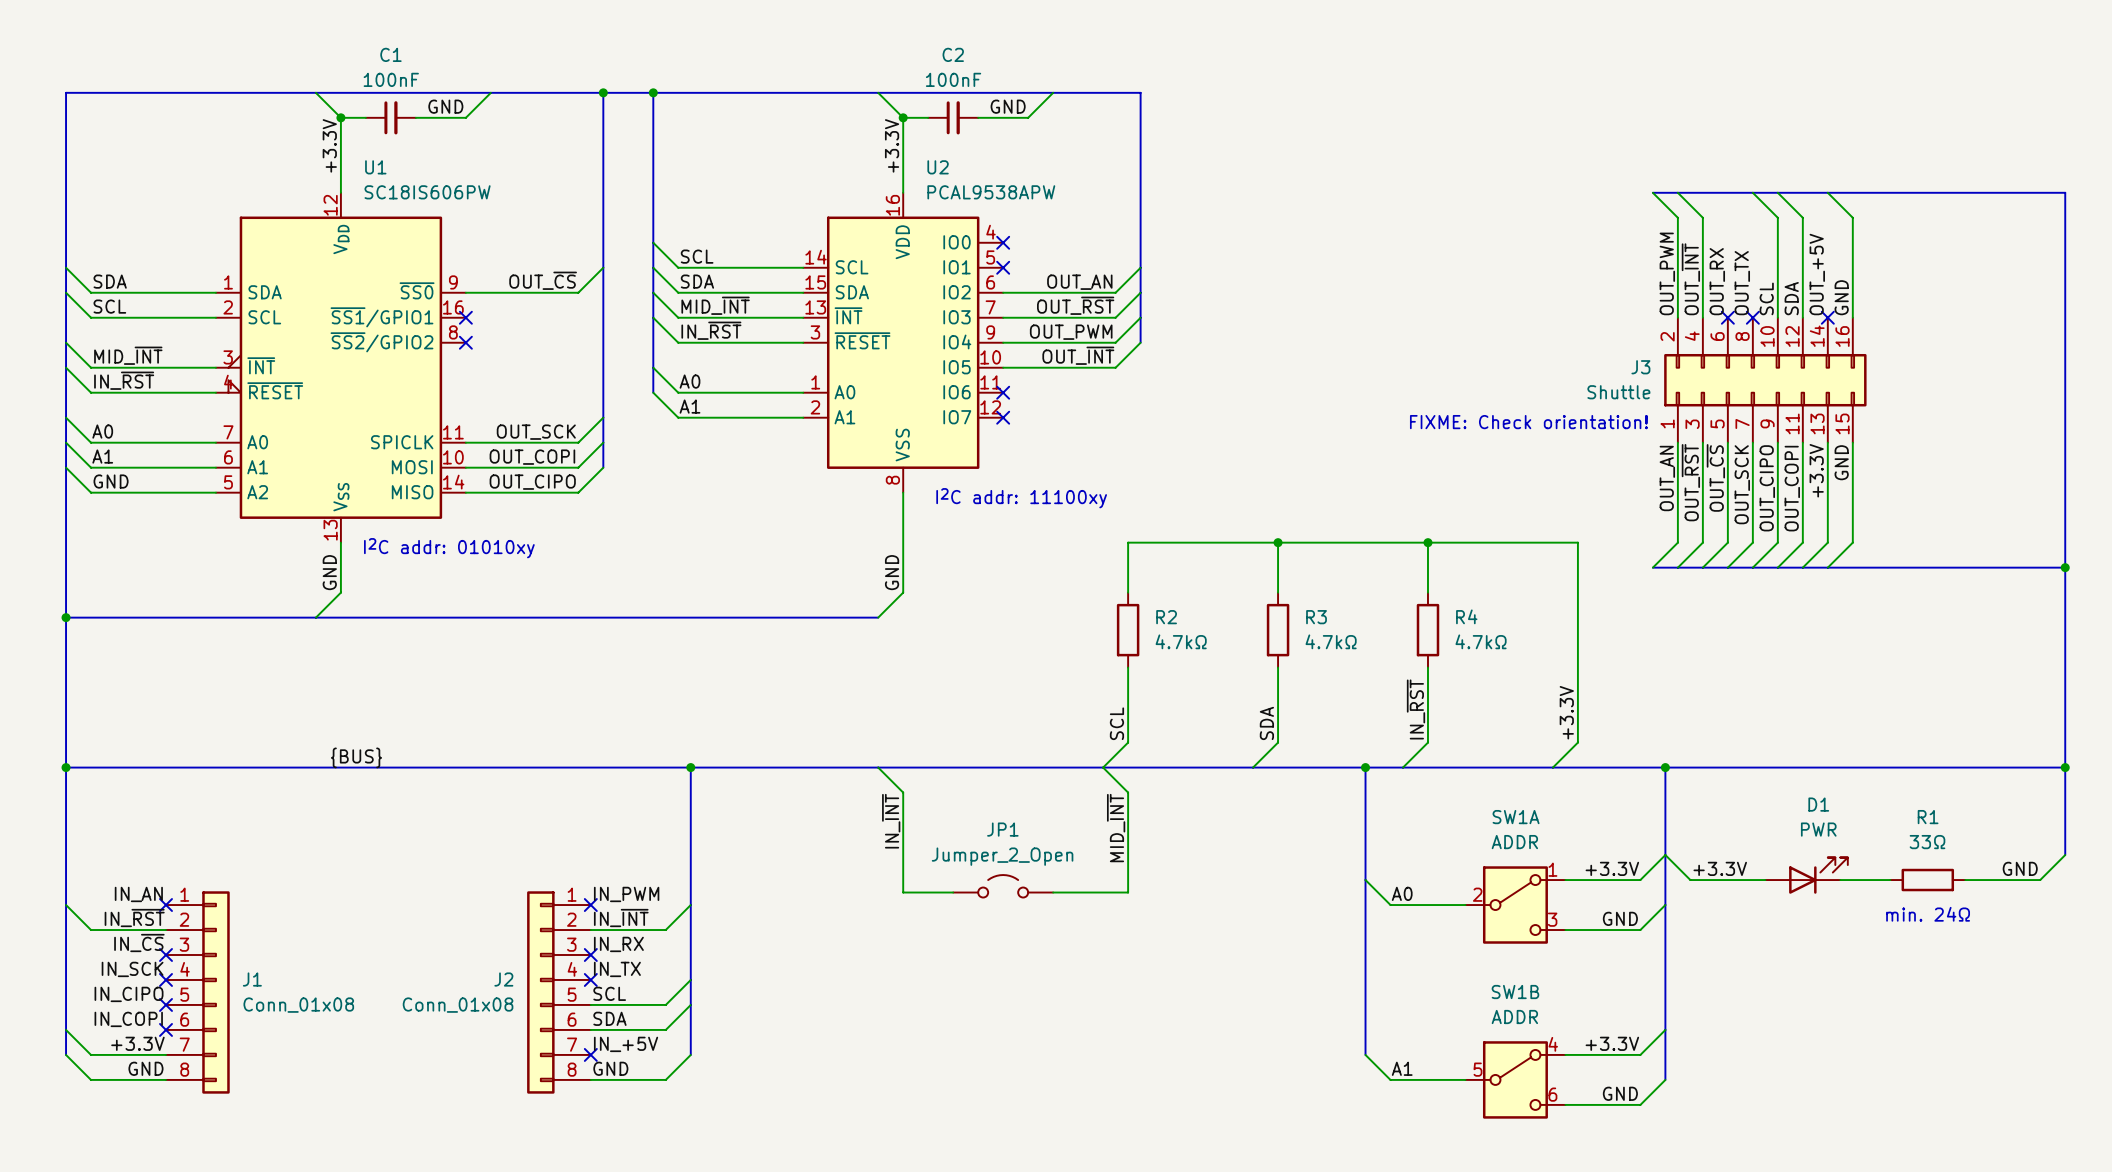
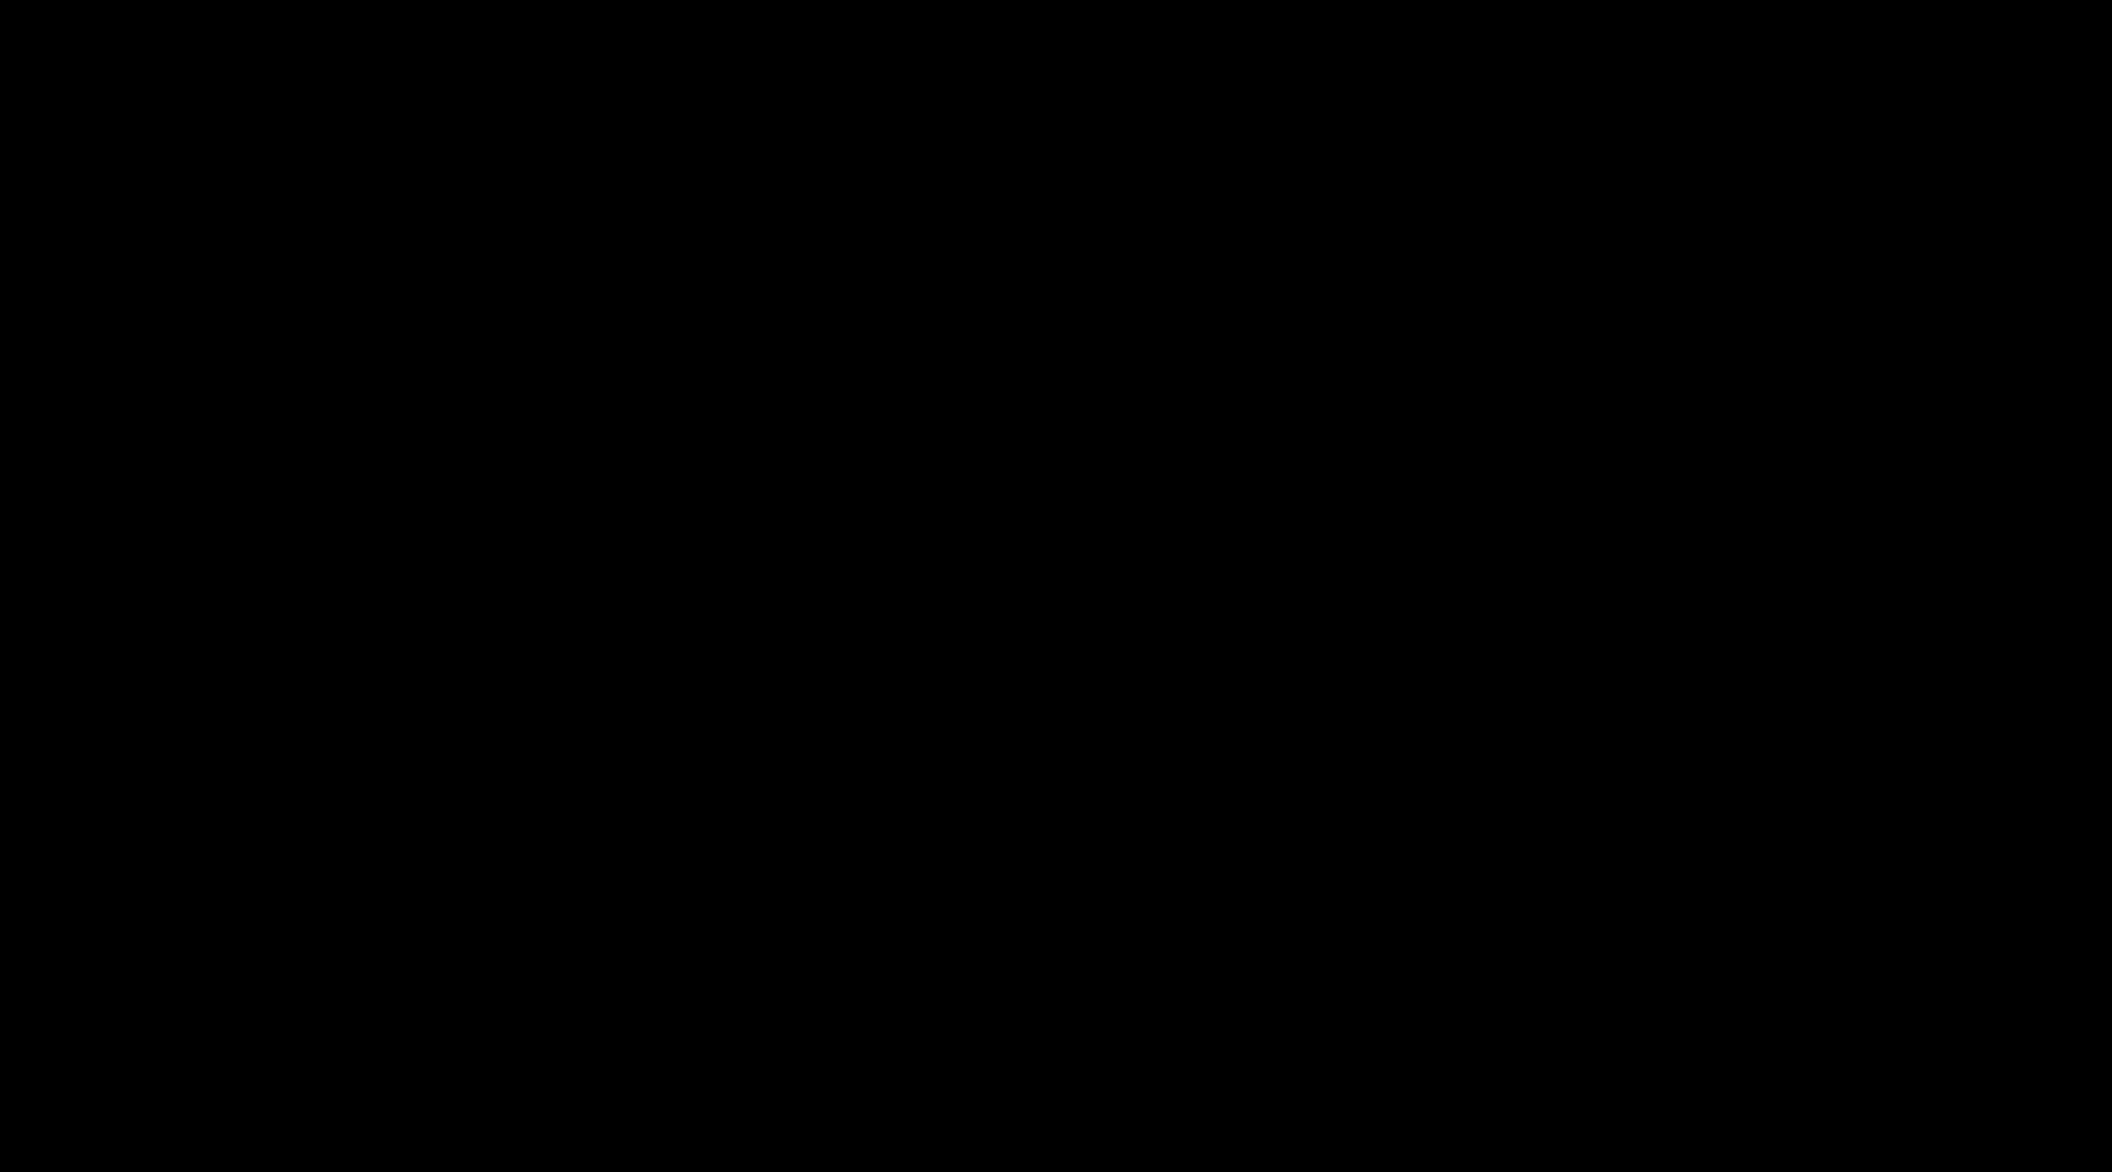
wire: (315, 92) (340, 117) -> none
wire: (490, 92) (465, 117) (415, 117) -> none
bus: (603, 92) (603, 467) -> none
junction: (603, 92) -> none
bus: (653, 92) (653, 392) -> none
junction: (653, 92) -> none
wire: (878, 92) (903, 117) -> none
wire: (1053, 92) (1028, 117) (978, 117) -> none
label: GND (445, 106) -> none
label: GND (1008, 106) -> none
wire: (340, 117) (365, 117) -> none
wire: (340, 117) (340, 192) -> none
junction: (340, 117) -> none
C1: 100nF (390, 117) -> none
wire: (903, 117) (928, 117) -> none
wire: (903, 117) (903, 192) -> none
junction: (903, 117) -> none
C2: 100nF (953, 117) -> none
label: +3.3V (329, 145) -> none
label: +3.3V (892, 145) -> none
wire: (1652, 192) (1677, 217) (1677, 317) -> none
bus: (1652, 192) (2065, 192) (2065, 855) -> none
wire: (1677, 192) (1702, 217) (1702, 317) -> none
wire: (1752, 192) (1777, 217) (1777, 317) -> none
wire: (1777, 192) (1802, 217) (1802, 317) -> none
wire: (1827, 192) (1852, 217) (1852, 317) -> none
wire: (653, 242) (678, 267) (803, 267) -> none
no-connect mark: (1003, 242) -> none
label: SCL (697, 256) -> none
wire: (66, 267) (91, 292) (215, 292) -> none
wire: (603, 267) (578, 292) (465, 292) -> none
wire: (653, 267) (678, 292) (803, 292) -> none
no-connect mark: (1003, 267) -> none
wire: (1140, 267) (1115, 292) (1003, 292) -> none
label: OUT_PWM (1667, 273) -> none
label: OUT_+5V (1817, 274) -> none
label: OUT_~{INT} (1690, 279) -> none
label: OUT_~{CS} (543, 280) -> none
label: SDA (110, 281) -> none
label: SDA (697, 281) -> none
label: OUT_RX (1717, 281) -> none
label: OUT_AN (1079, 282) -> none
label: OUT_TX (1742, 283) -> none
wire: (66, 292) (91, 317) (215, 317) -> none
wire: (653, 292) (678, 317) (803, 317) -> none
wire: (1140, 292) (1115, 317) (1003, 317) -> none
label: GND (1841, 297) -> none
label: SCL (1766, 298) -> none
label: SDA (1791, 298) -> none
label: MID_~{INT} (715, 305) -> none
label: OUT_~{RST} (1075, 305) -> none
label: SCL (109, 306) -> none
no-connect mark: (465, 317) -> none
wire: (653, 317) (678, 342) (803, 342) -> none
wire: (1140, 317) (1115, 342) (1003, 342) -> none
no-connect mark: (1727, 317) -> none
no-connect mark: (1752, 317) -> none
no-connect mark: (1827, 317) -> none
label: IN_~{RST} (711, 330) -> none
label: OUT_PWM (1071, 332) -> none
wire: (66, 342) (91, 367) (215, 367) -> none
no-connect mark: (465, 342) -> none
U2: PCAL9538APW (903, 342) -> none
wire: (1140, 342) (1115, 367) (1003, 367) -> none
bus: (1140, 342) (1140, 92) (66, 92) (66, 1054) -> none
label: MID_~{INT} (128, 355) -> none
label: OUT_~{INT} (1078, 355) -> none
wire: (66, 367) (91, 392) (215, 392) -> none
U1: SC18IS606PW (340, 367) -> none
wire: (653, 367) (678, 392) (803, 392) -> none
label: IN_~{RST} (124, 380) -> none
J3: Shuttle (1765, 380) -> none
label: A0 (689, 381) -> none
wire: (653, 392) (678, 417) (803, 417) -> none
no-connect mark: (1003, 392) -> none
label: A1 (689, 406) -> none
wire: (66, 417) (91, 442) (215, 442) -> none
wire: (603, 417) (578, 442) (465, 442) -> none
no-connect mark: (1003, 417) -> none
text: FIXME: Check orientation! (1528, 422) -> none
label: A0 (102, 431) -> none
label: OUT_SCK (536, 432) -> none
wire: (66, 442) (91, 467) (215, 467) -> none
wire: (603, 442) (578, 467) (465, 467) -> none
wire: (1677, 442) (1677, 542) (1652, 567) -> none
wire: (1702, 442) (1702, 542) (1677, 567) -> none
wire: (1727, 442) (1727, 542) (1702, 567) -> none
wire: (1752, 442) (1752, 542) (1727, 567) -> none
wire: (1777, 442) (1777, 542) (1752, 567) -> none
wire: (1802, 442) (1802, 542) (1777, 567) -> none
wire: (1827, 442) (1827, 542) (1802, 567) -> none
wire: (1852, 442) (1852, 542) (1827, 567) -> none
label: A1 (102, 456) -> none
label: OUT_COPI (532, 457) -> none
label: GND (1841, 462) -> none
wire: (66, 467) (91, 492) (215, 492) -> none
wire: (603, 467) (578, 492) (465, 492) -> none
label: +3.3V (1816, 470) -> none
label: OUT_~{CS} (1715, 477) -> none
label: OUT_AN (1667, 478) -> none
label: GND (111, 481) -> none
label: OUT_CIPO (532, 482) -> none
label: OUT_~{RST} (1690, 482) -> none
label: OUT_SCK (1742, 484) -> none
label: OUT_CIPO (1767, 488) -> none
label: OUT_COPI (1792, 488) -> none
wire: (903, 492) (903, 592) (878, 617) -> none
text: I2C addr: 11100xy (1021, 498) -> none
wire: (340, 542) (340, 592) (315, 617) -> none
wire: (1278, 542) (1278, 592) -> none
junction: (1278, 542) -> none
wire: (1427, 542) (1427, 592) -> none
junction: (1427, 542) -> none
text: I2C addr: 01010xy (449, 548) -> none
bus: (1652, 567) (2065, 567) -> none
junction: (2065, 567) -> none
label: GND (329, 572) -> none
label: GND (892, 572) -> none
wire: (1128, 592) (1128, 542) (1577, 542) (1577, 742) (1552, 767) -> none
bus: (66, 617) (878, 617) -> none
junction: (66, 617) -> none
R2: 4.7kΩ (1128, 630) -> none
R3: 4.7kΩ (1278, 630) -> none
R4: 4.7kΩ (1427, 630) -> none
wire: (1128, 667) (1128, 742) (1103, 767) (1128, 792) (1128, 892) (1053, 892) -> none
wire: (1278, 667) (1278, 742) (1253, 767) -> none
wire: (1427, 667) (1427, 742) (1403, 767) -> none
label: IN_~{RST} (1416, 709) -> none
label: +3.3V (1566, 712) -> none
label: SCL (1116, 723) -> none
label: SDA (1266, 723) -> none
label: {BUS} (356, 757) -> none
bus: (66, 767) (2065, 767) -> none
junction: (66, 767) -> none
bus: (690, 767) (690, 1054) -> none
junction: (690, 767) -> none
wire: (878, 767) (903, 792) (903, 892) (953, 892) -> none
bus: (1365, 767) (1365, 1054) -> none
junction: (1365, 767) -> none
bus: (1665, 767) (1665, 1079) -> none
junction: (1665, 767) -> none
junction: (2065, 767) -> none
label: IN_~{INT} (891, 821) -> none
label: MID_~{INT} (1116, 828) -> none
wire: (2065, 855) (2040, 880) (1965, 880) -> none
label: +3.3V (1612, 868) -> none
label: +3.3V (1720, 868) -> none
label: GND (2020, 868) -> none
D1: PWR (1806, 875) -> none
wire: (1365, 880) (1390, 905) (1465, 905) -> none
wire: (1565, 880) (1640, 880) (1665, 855) (1690, 880) (1765, 880) -> none
wire: (1840, 880) (1890, 880) -> none
R1: 33Ω (1927, 880) -> none
JP1: Jumper_2_Open (1003, 886) -> none
label: A0 (1402, 893) -> none
label: IN_AN (138, 894) -> none
label: IN_PWM (626, 894) -> none
wire: (66, 905) (91, 930) (166, 930) -> none
no-connect mark: (166, 905) -> none
no-connect mark: (590, 905) -> none
wire: (690, 905) (665, 930) (590, 930) -> none
SW1A: ADDR (1515, 905) -> none
wire: (1665, 905) (1640, 930) (1565, 930) -> none
text: min. 24Ω (1928, 914) -> none
label: IN_~{RST} (134, 918) -> none
label: IN_~{INT} (621, 918) -> none
label: GND (1620, 918) -> none
label: IN_~{CS} (139, 943) -> none
label: IN_RX (618, 944) -> none
no-connect mark: (166, 954) -> none
no-connect mark: (590, 954) -> none
label: IN_SCK (132, 969) -> none
label: IN_TX (617, 969) -> none
no-connect mark: (166, 979) -> none
no-connect mark: (590, 979) -> none
wire: (690, 979) (665, 1004) (590, 1004) -> none
J1: Conn_01x08 (197, 992) -> none
J2: Conn_01x08 (558, 992) -> none
label: SCL (609, 993) -> none
label: IN_CIPO (129, 994) -> none
no-connect mark: (166, 1004) -> none
wire: (690, 1004) (665, 1029) (590, 1029) -> none
label: SDA (609, 1018) -> none
label: IN_COPI (128, 1019) -> none
wire: (66, 1029) (91, 1054) (166, 1054) -> none
no-connect mark: (166, 1029) -> none
wire: (1665, 1029) (1640, 1054) (1565, 1054) -> none
label: +3.3V (137, 1043) -> none
label: +3.3V (1612, 1043) -> none
label: IN_+5V (626, 1044) -> none
wire: (66, 1054) (91, 1079) (166, 1079) -> none
no-connect mark: (590, 1054) -> none
wire: (690, 1054) (665, 1079) (590, 1079) -> none
wire: (1365, 1054) (1390, 1079) (1465, 1079) -> none
label: GND (145, 1068) -> none
label: GND (610, 1068) -> none
label: A1 (1402, 1068) -> none
SW1B: ADDR (1515, 1079) -> none
wire: (1665, 1079) (1640, 1104) (1565, 1104) -> none
label: GND (1620, 1093) -> none

